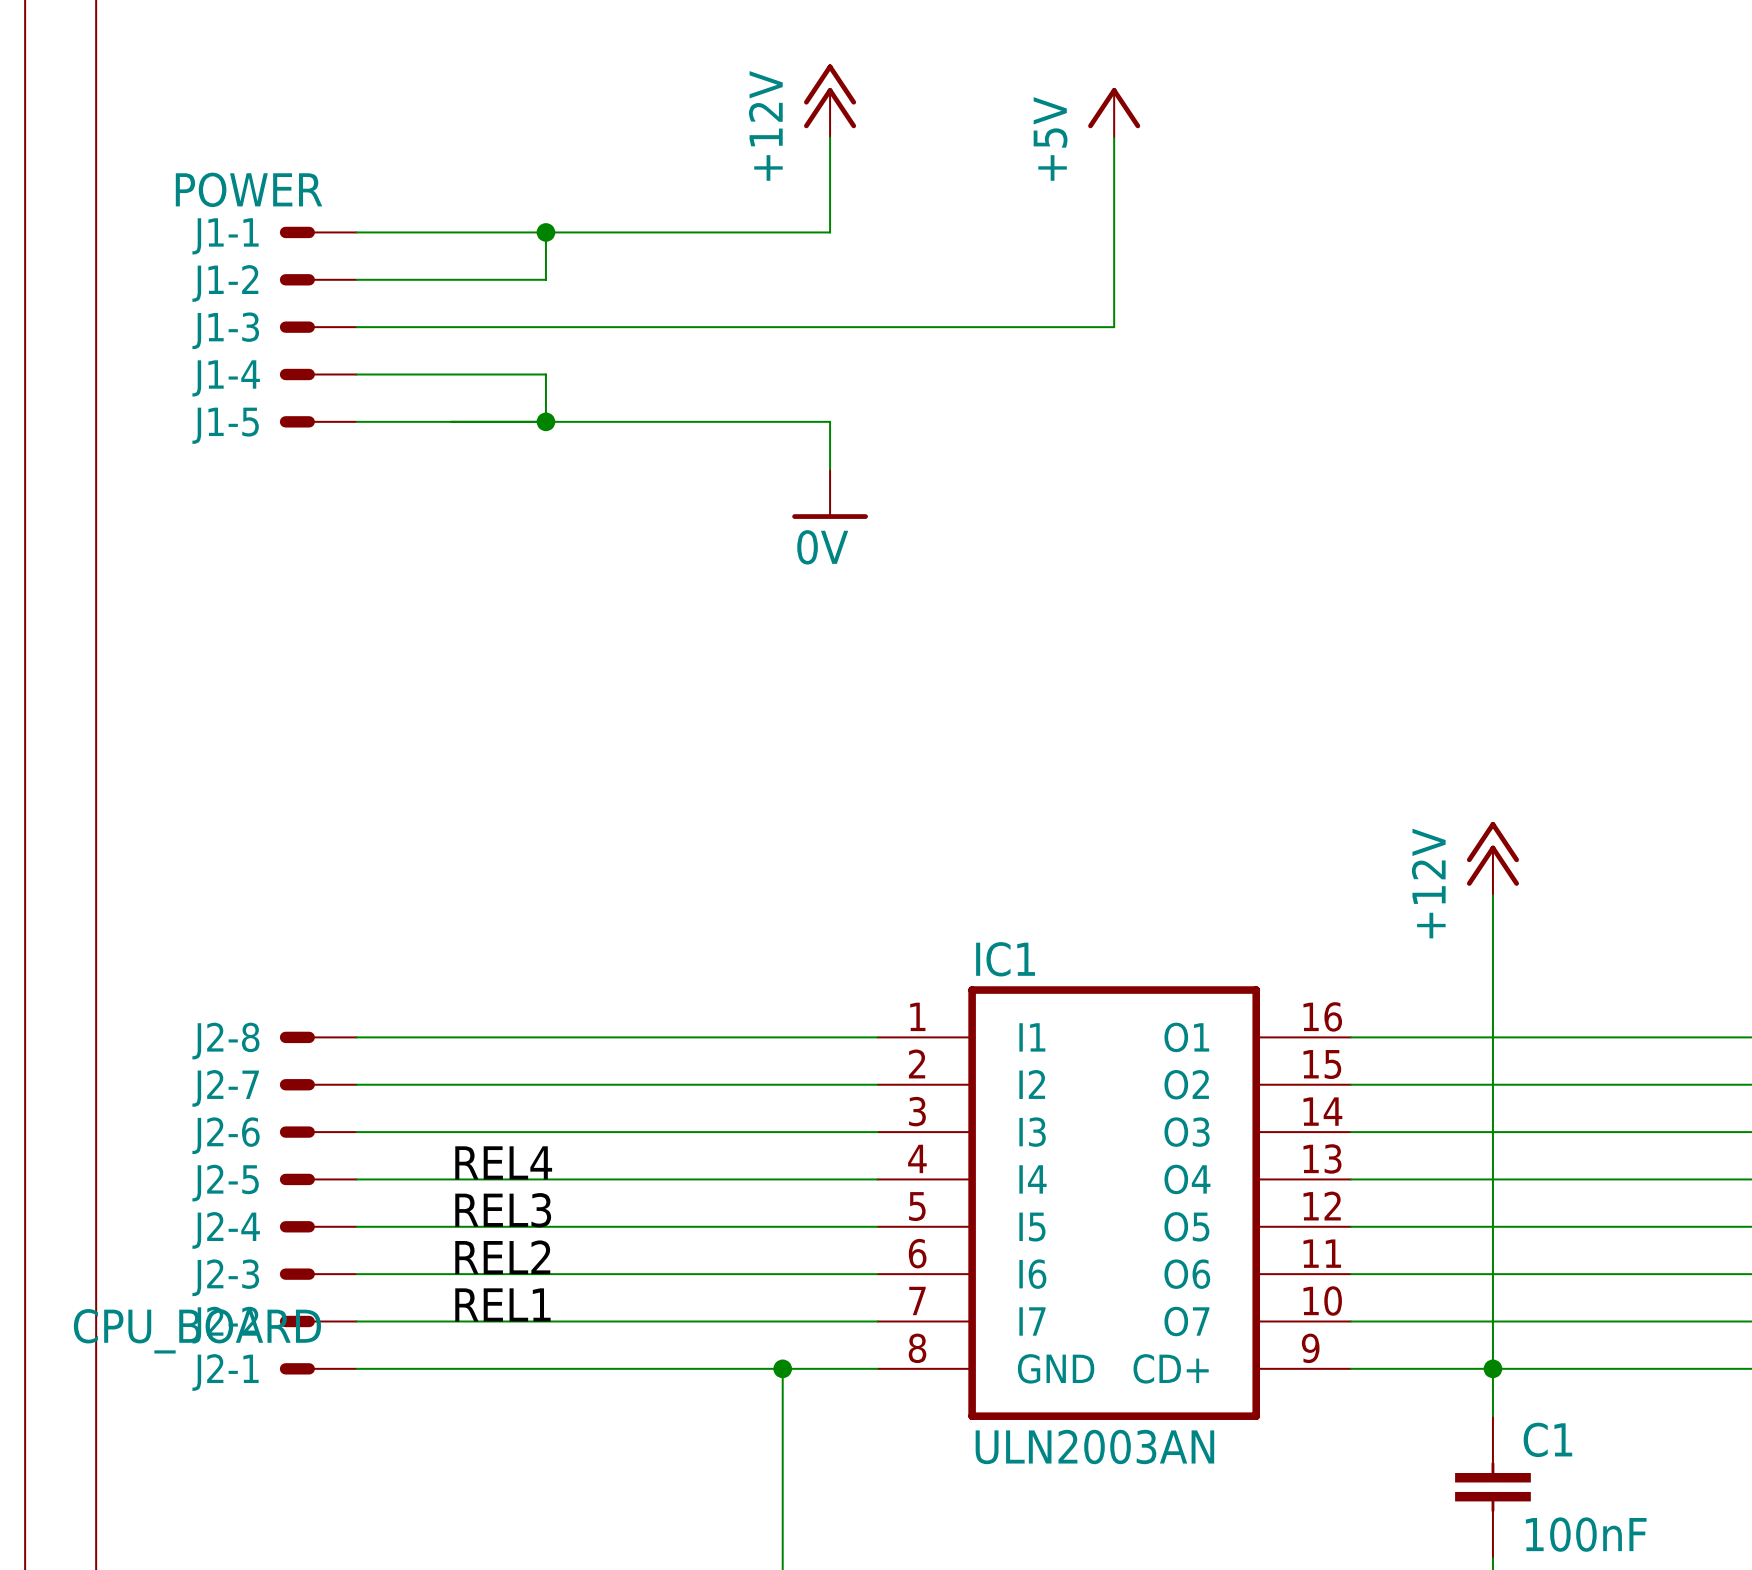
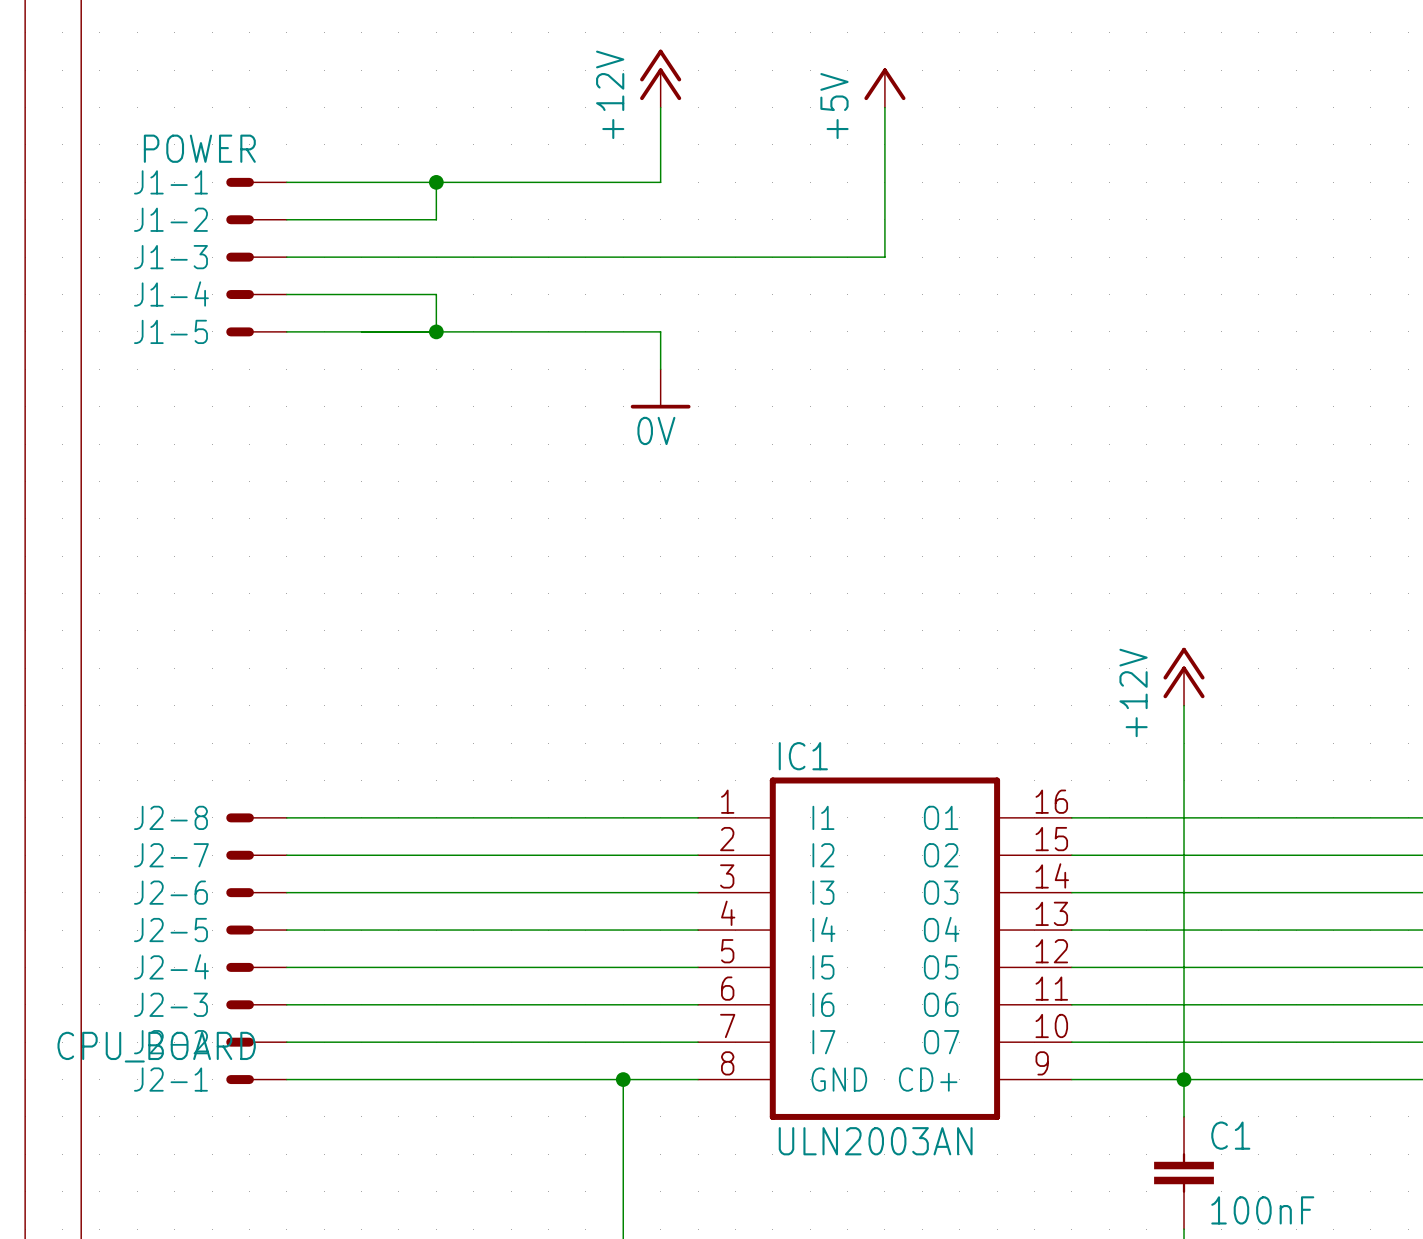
label: REL4 (503, 1162) -> none
label: REL3 (503, 1210) -> none
label: REL2 (502, 1257) -> none
label: REL1 (502, 1304) -> none

